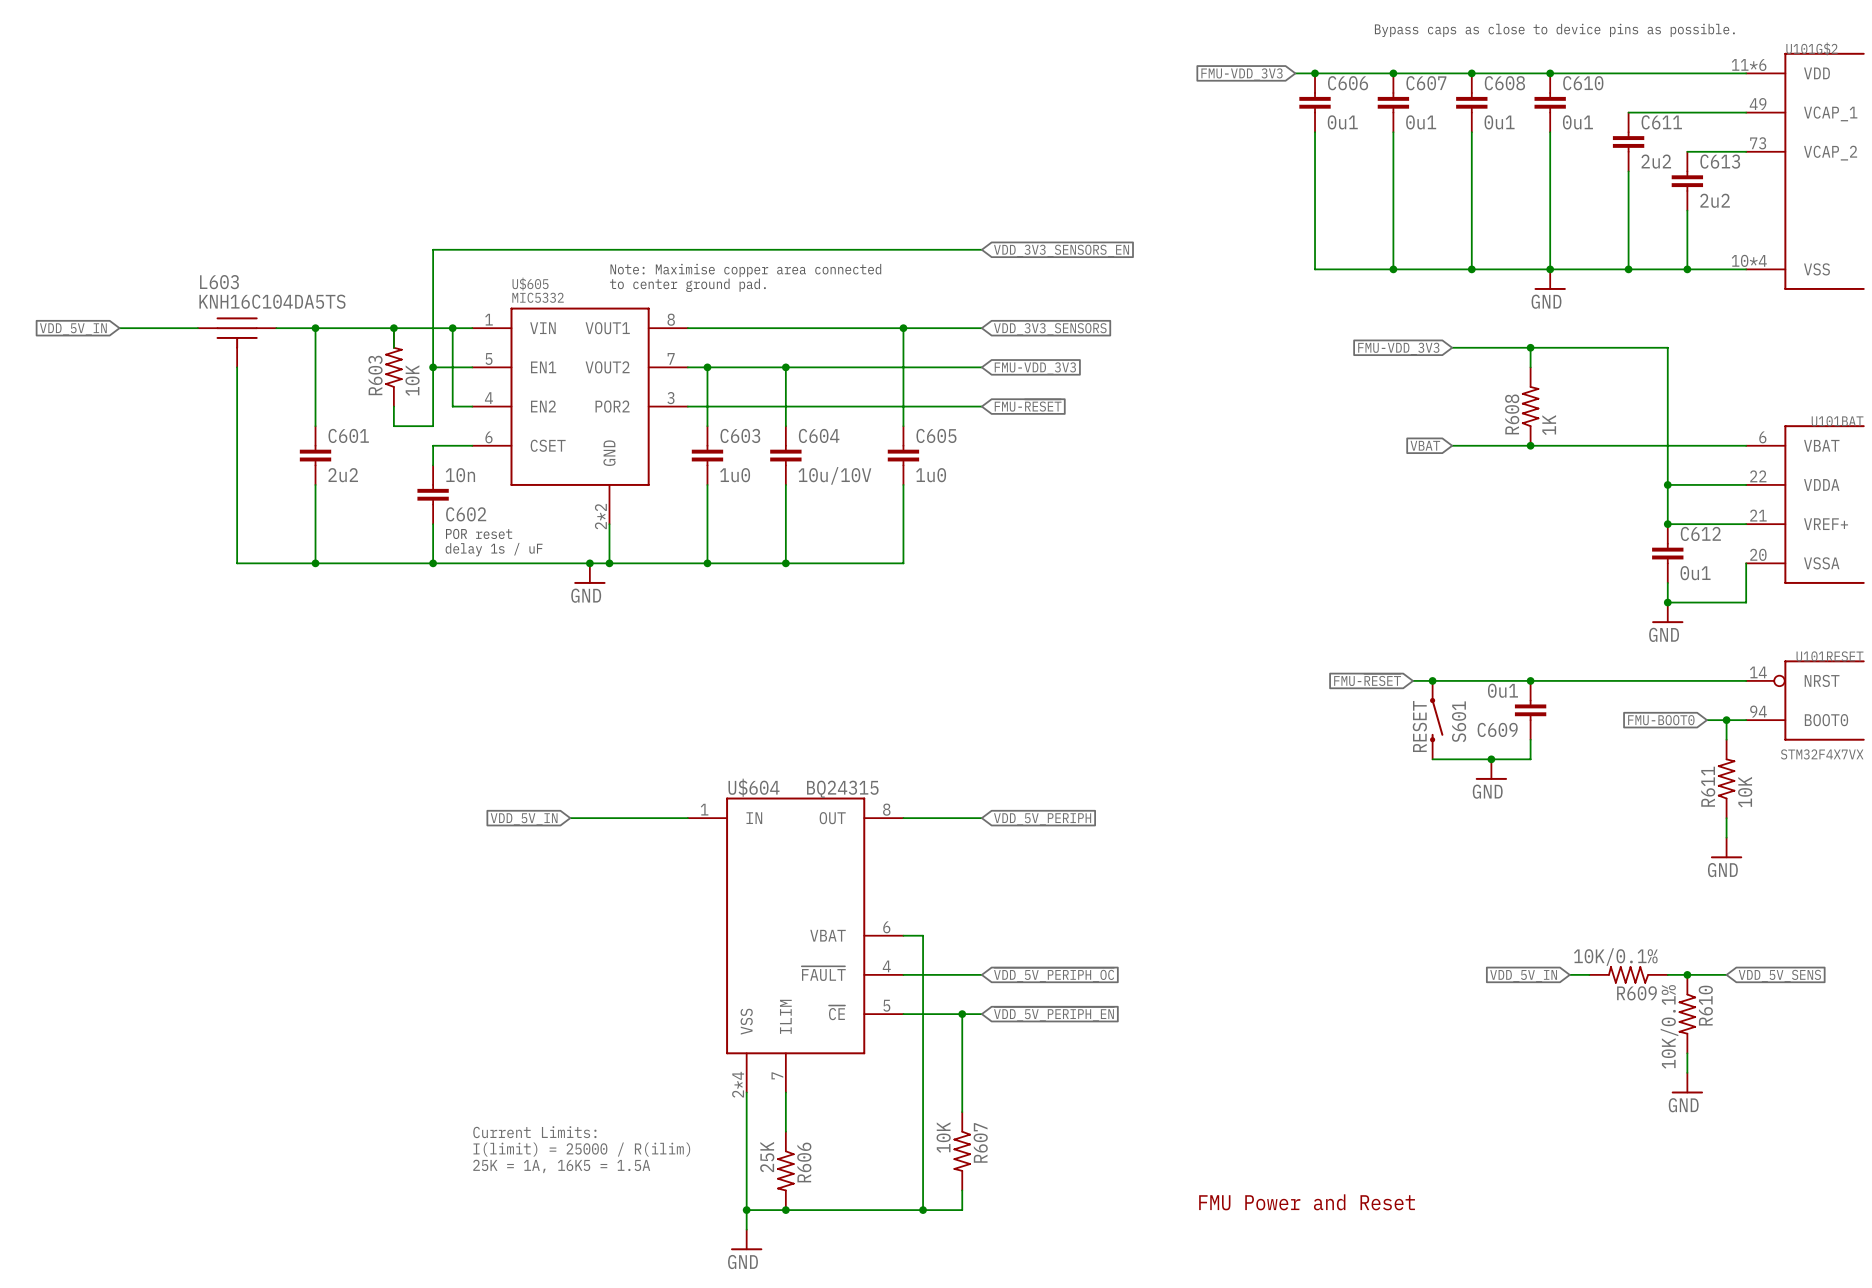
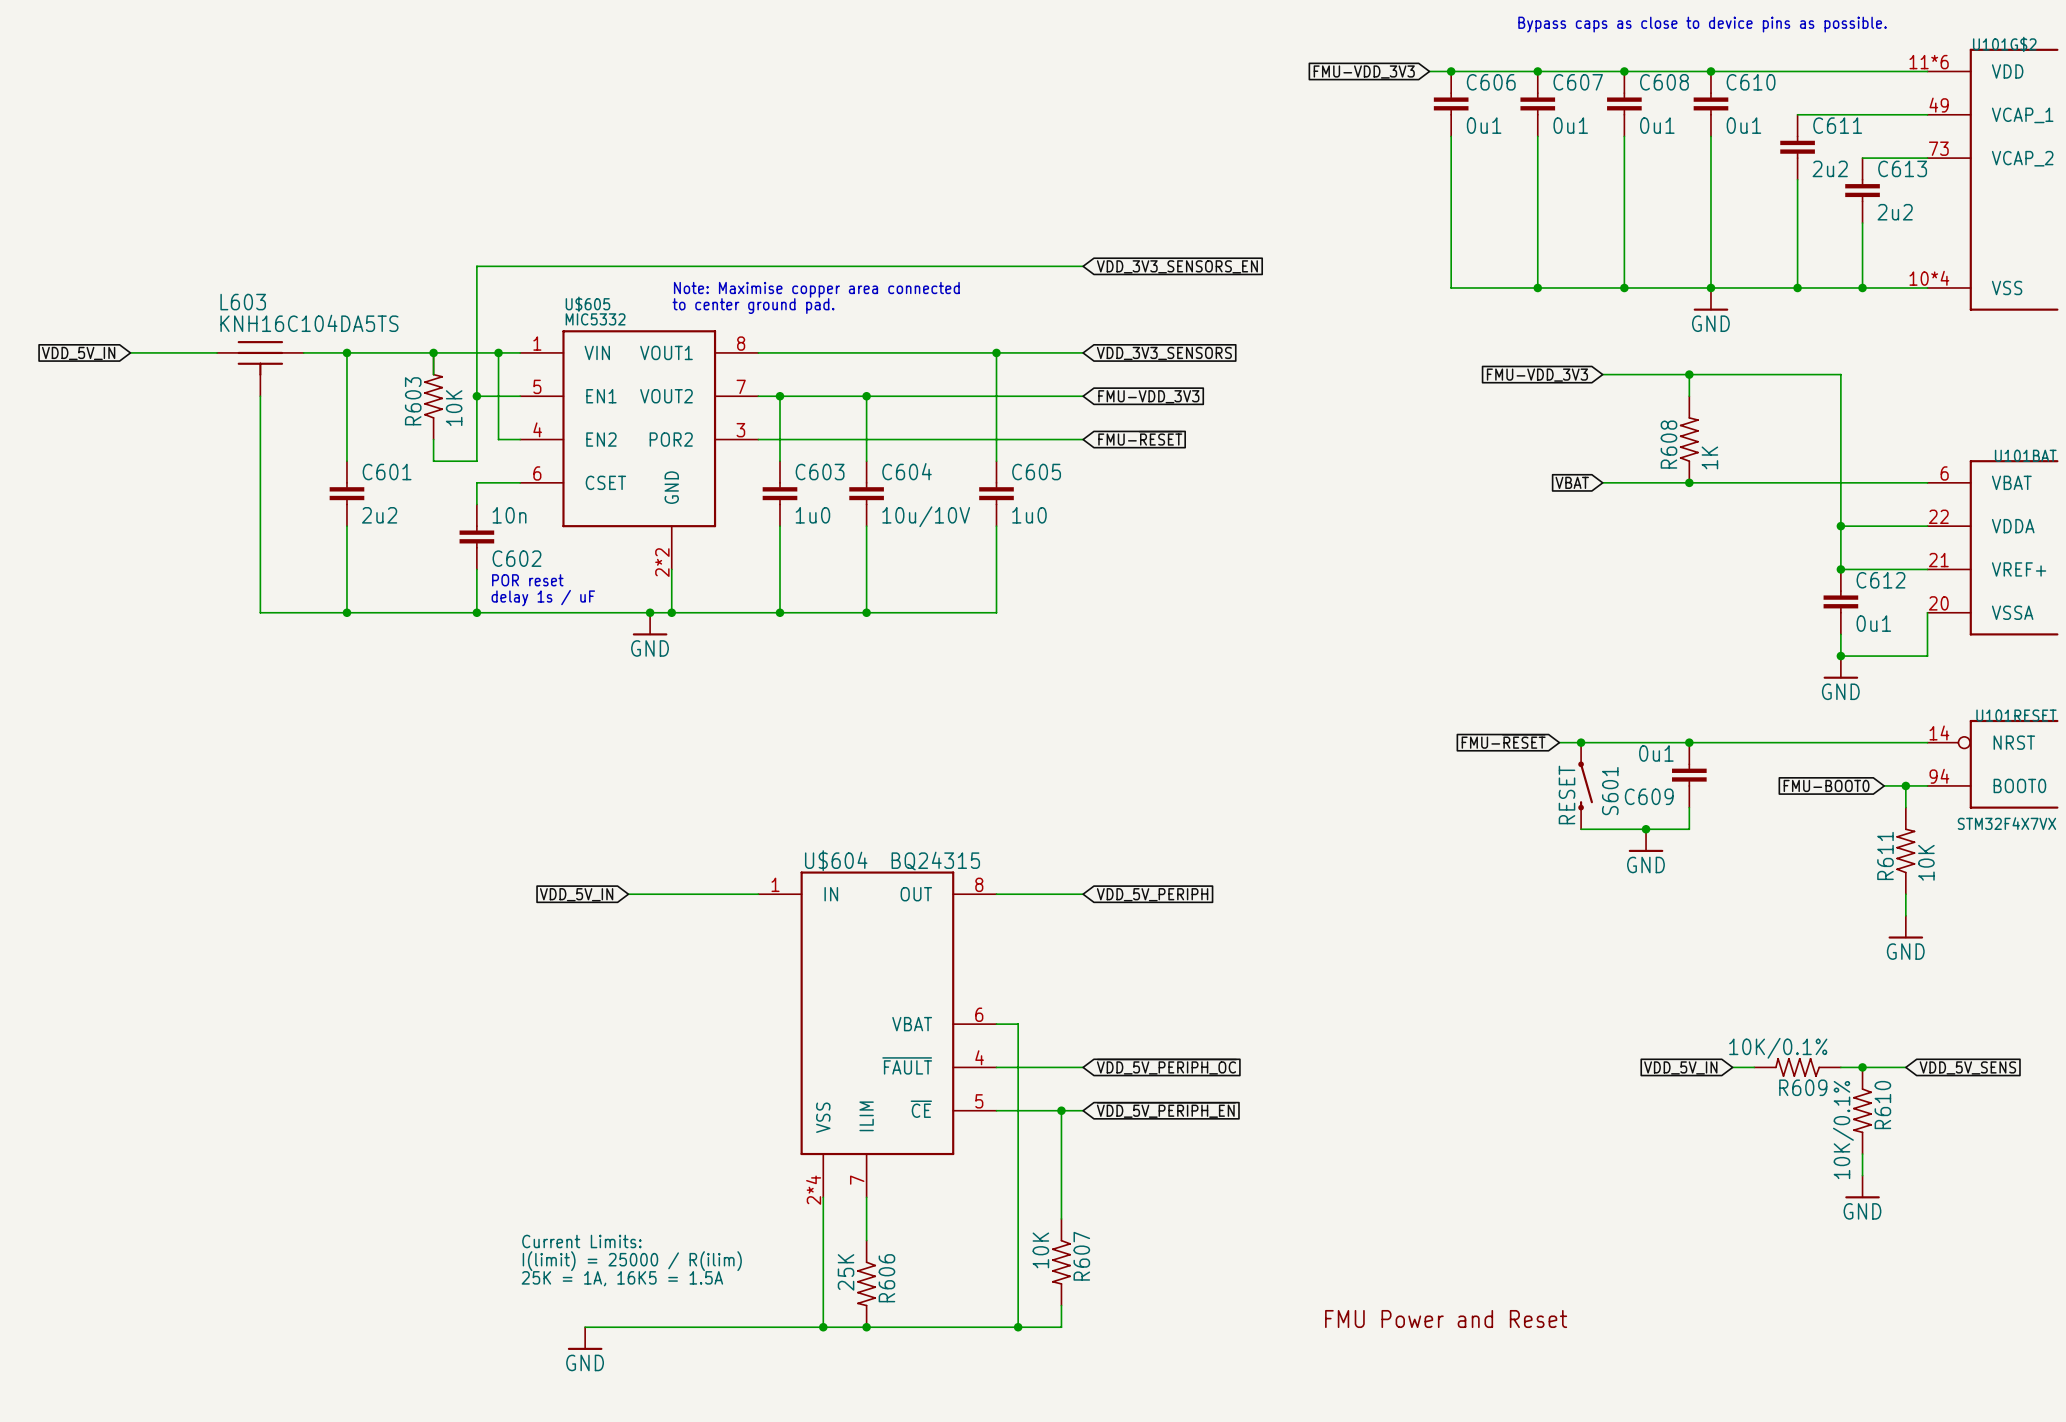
wire: (746, 1210) (746, 1229) -> (823, 1327) (585, 1327)
power symbol: none -> GND (585, 1338)
power symbol: GND (746, 1239) -> none

